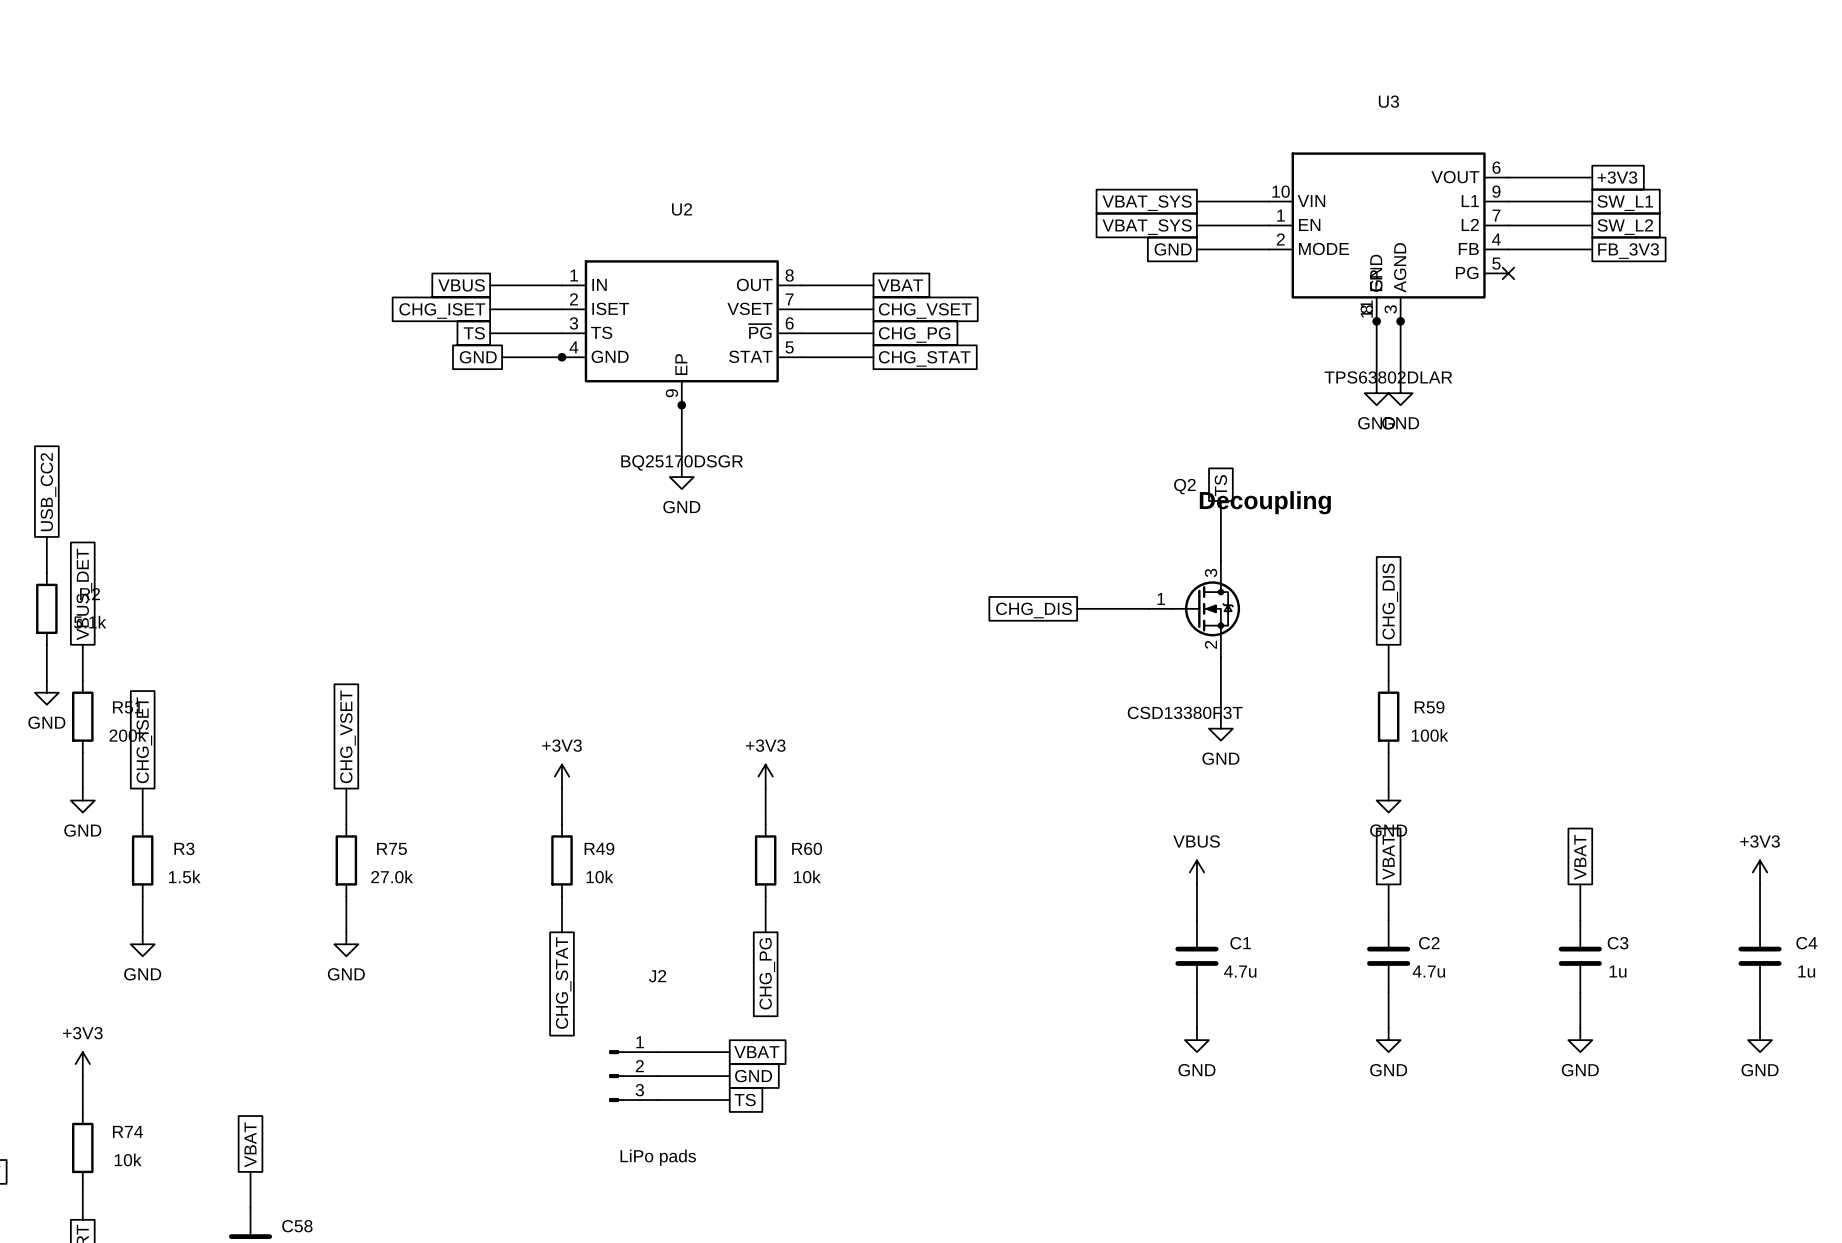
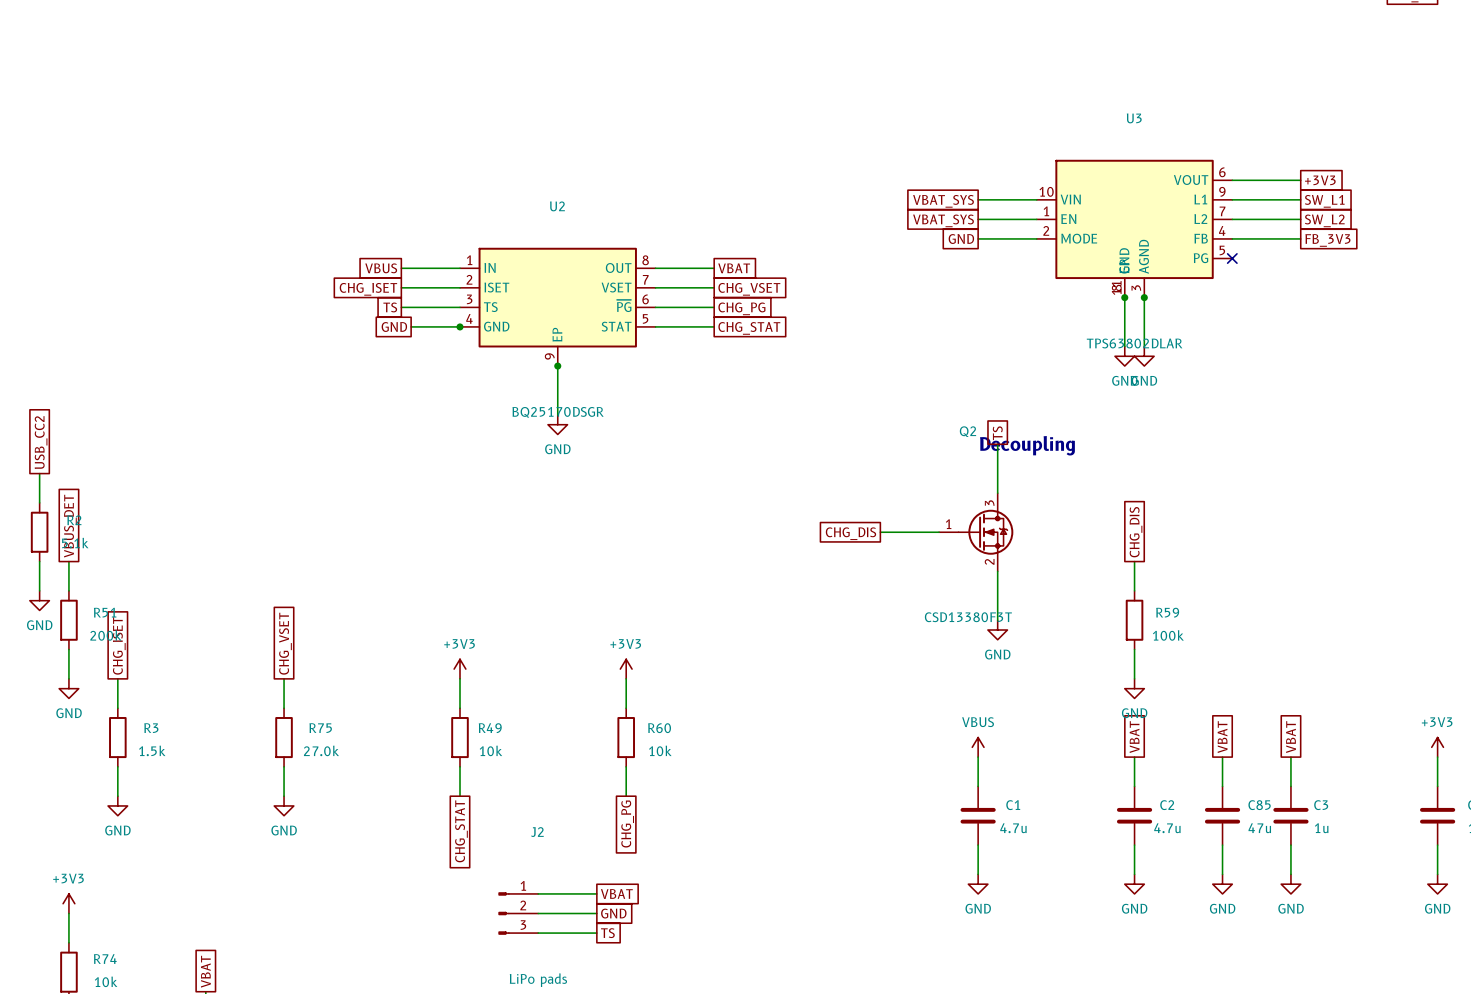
global label: none -> VBAT (1222, 737)
wire: none -> (1222, 757) (1222, 786)
C85: none -> 47u (1222, 815)
wire: none -> (1222, 845) (1222, 874)
power symbol: none -> GND (1222, 884)

